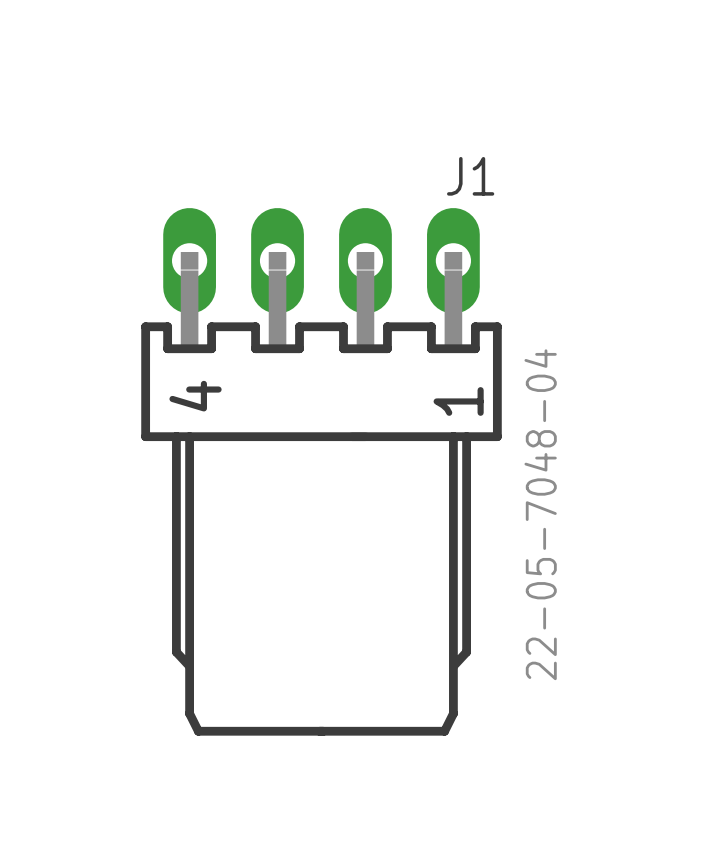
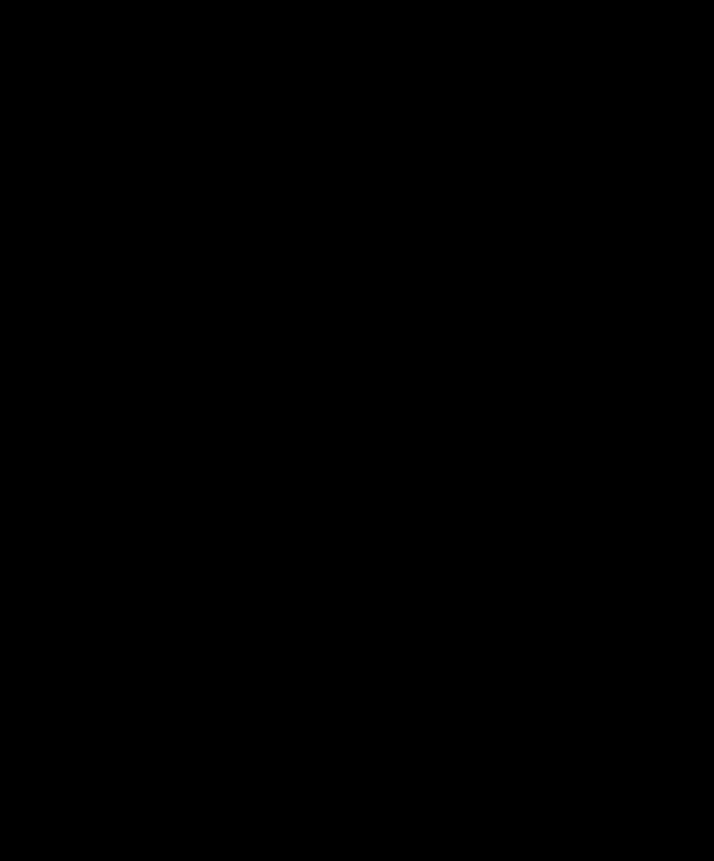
J1: 22-05-7048-04 (321, 471) -> none

